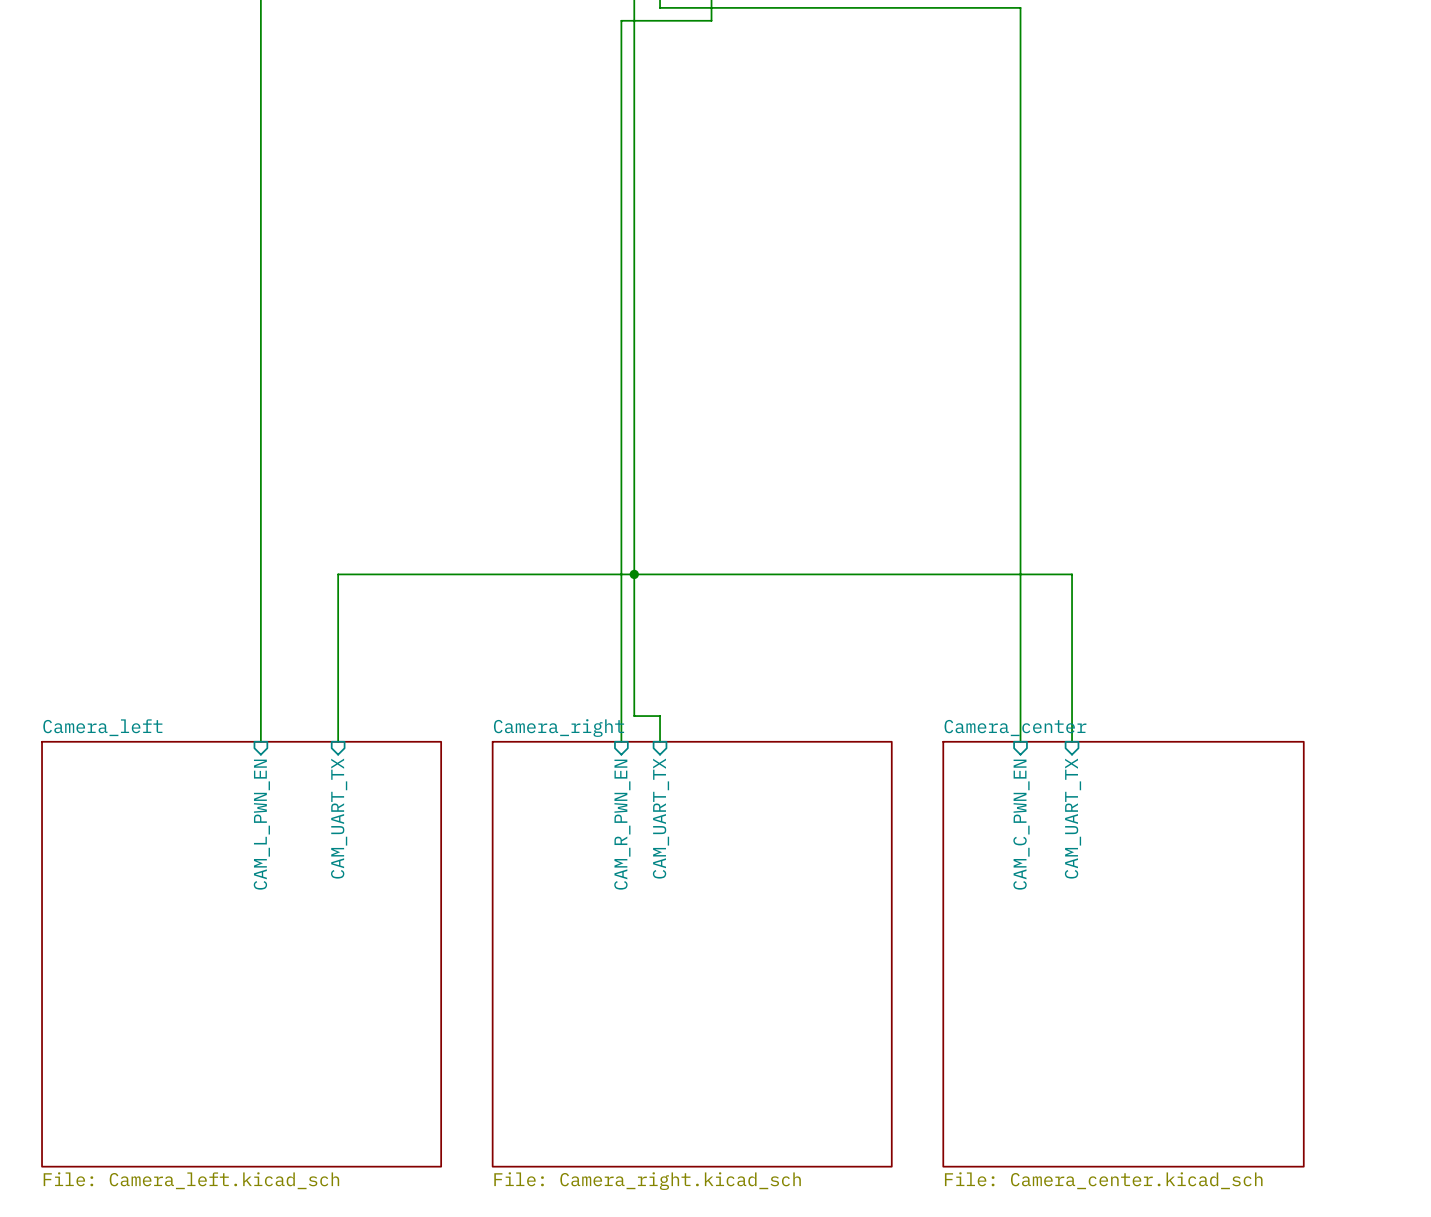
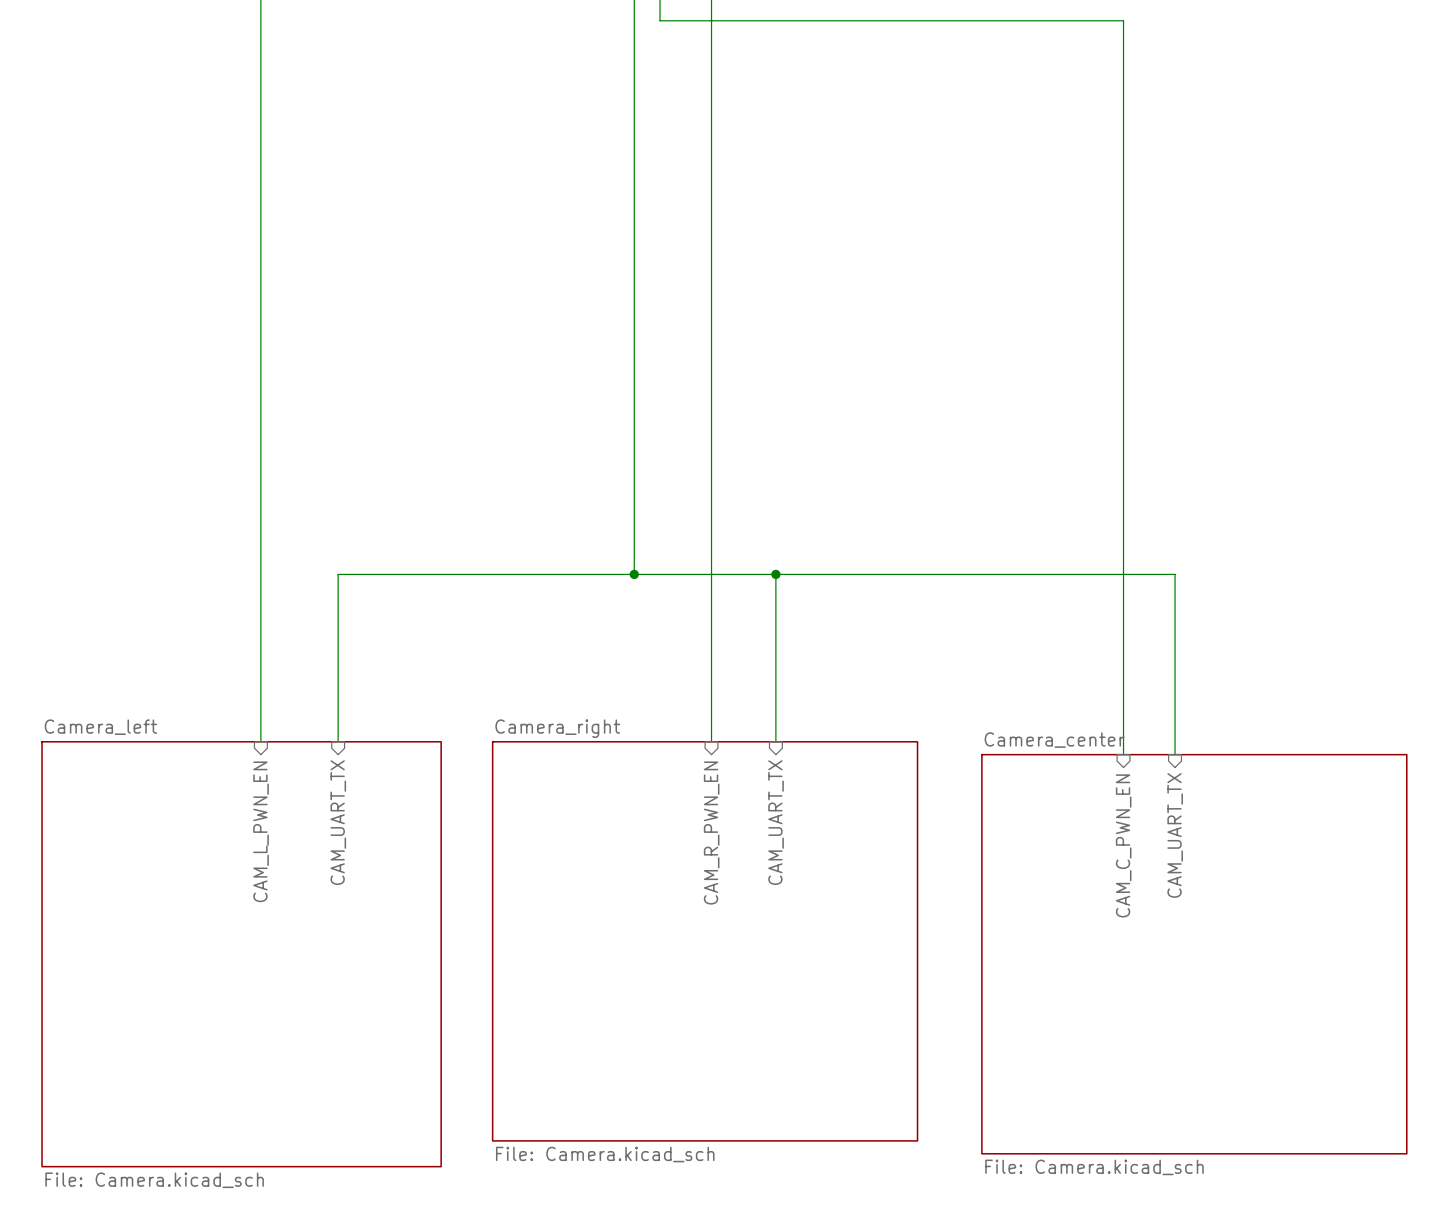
wire: (660, 7) (1020, 7) (1020, 741) -> none
wire: (660, 20) (621, 20) (621, 741) -> (660, 20) (660, 7)
wire: (634, 574) (634, 716) (660, 716) (660, 741) -> none
wire: none -> (775, 574) (775, 741)
junction: none -> (775, 574)
wire: (1072, 574) (1072, 741) -> (1072, 574) (1175, 574) (1175, 754)
wire: none -> (711, 741) (711, 20) (1123, 20) (1123, 754)
sheet pin position: CAM_UART_TX (660, 818) -> CAM_UART_TX (776, 822)
sheet pin position: CAM_UART_TX (1072, 818) -> CAM_UART_TX (1175, 835)
sheet pin position: CAM_R_PWN_EN (622, 824) -> CAM_R_PWN_EN (711, 833)
sheet pin position: CAM_C_PWN_EN (1021, 824) -> CAM_C_PWN_EN (1123, 845)
sheet Camera_right: none -> File: Camera.kicad_sch (705, 941)
sheet Camera_right: File: Camera_right.kicad_sch (692, 954) -> none
sheet Camera_center: File: Camera_center.kicad_sch (1123, 954) -> none
sheet Camera_center: none -> File: Camera.kicad_sch (1194, 954)
sheet Camera_left value: File: Camera_left.kicad_sch (191, 1180) -> File: Camera.kicad_sch (154, 1180)

